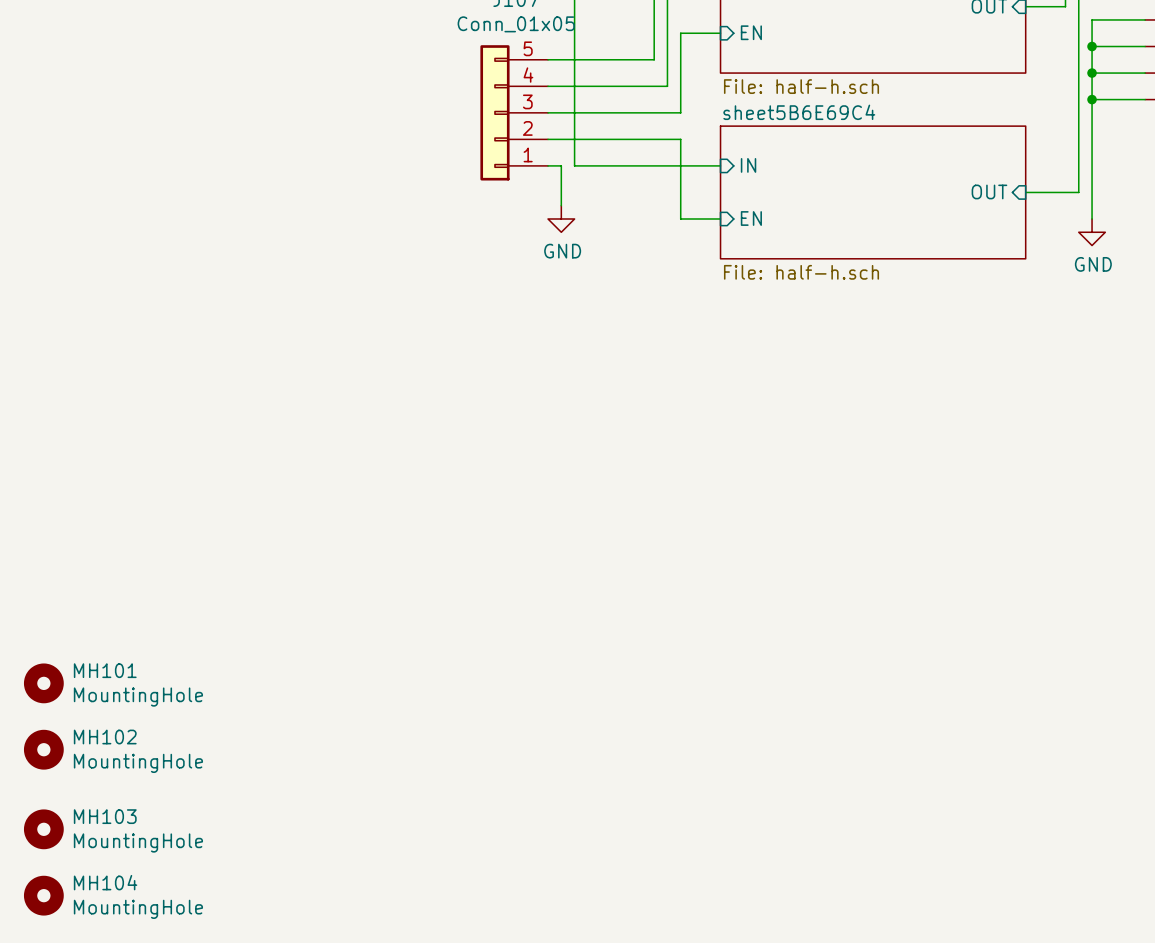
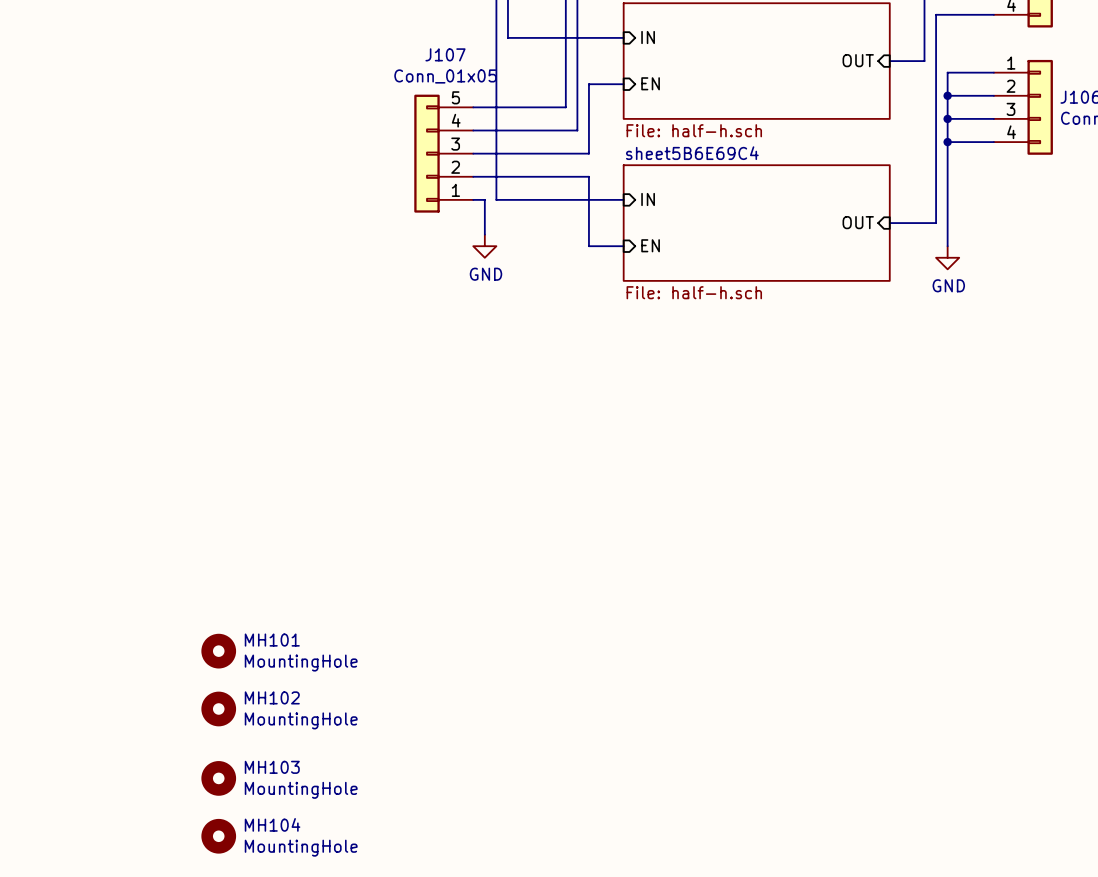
MH101 position: (43, 683) -> (218, 651)
MH102 position: (43, 749) -> (218, 708)
MH103 position: (43, 829) -> (218, 778)
MH104 position: (43, 895) -> (218, 836)

